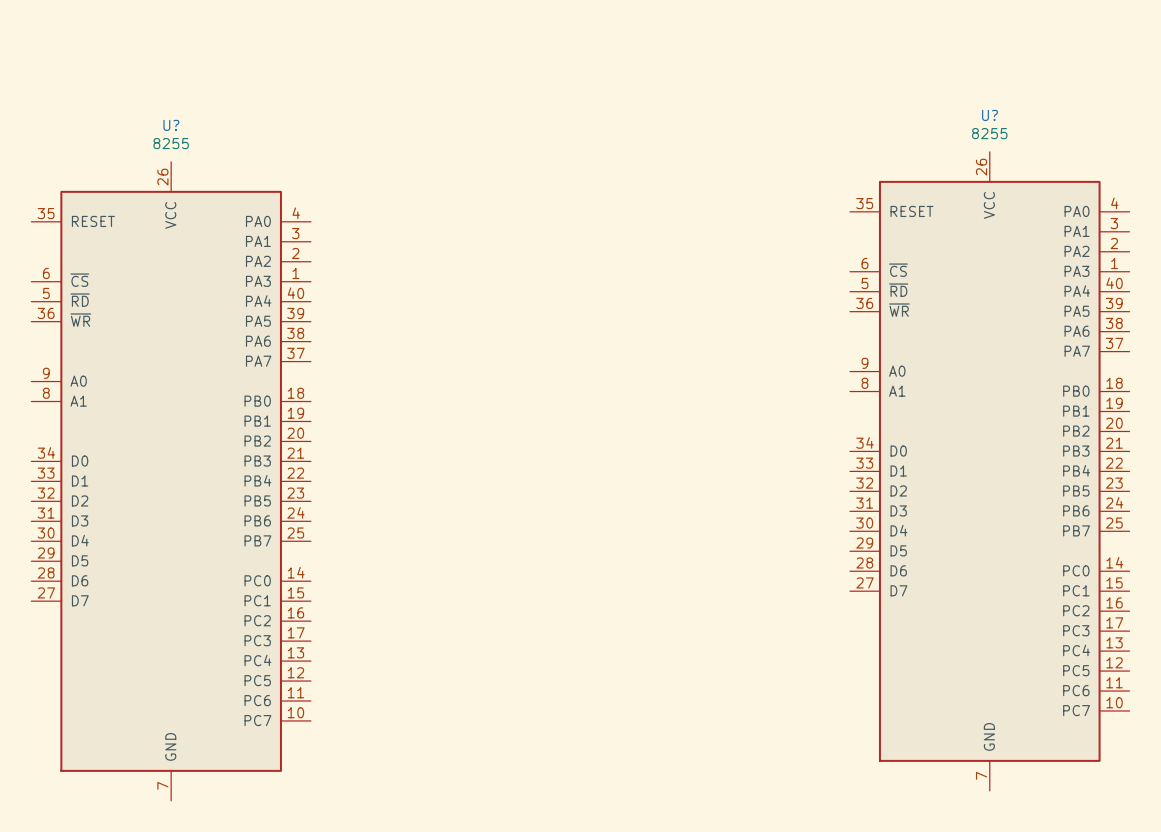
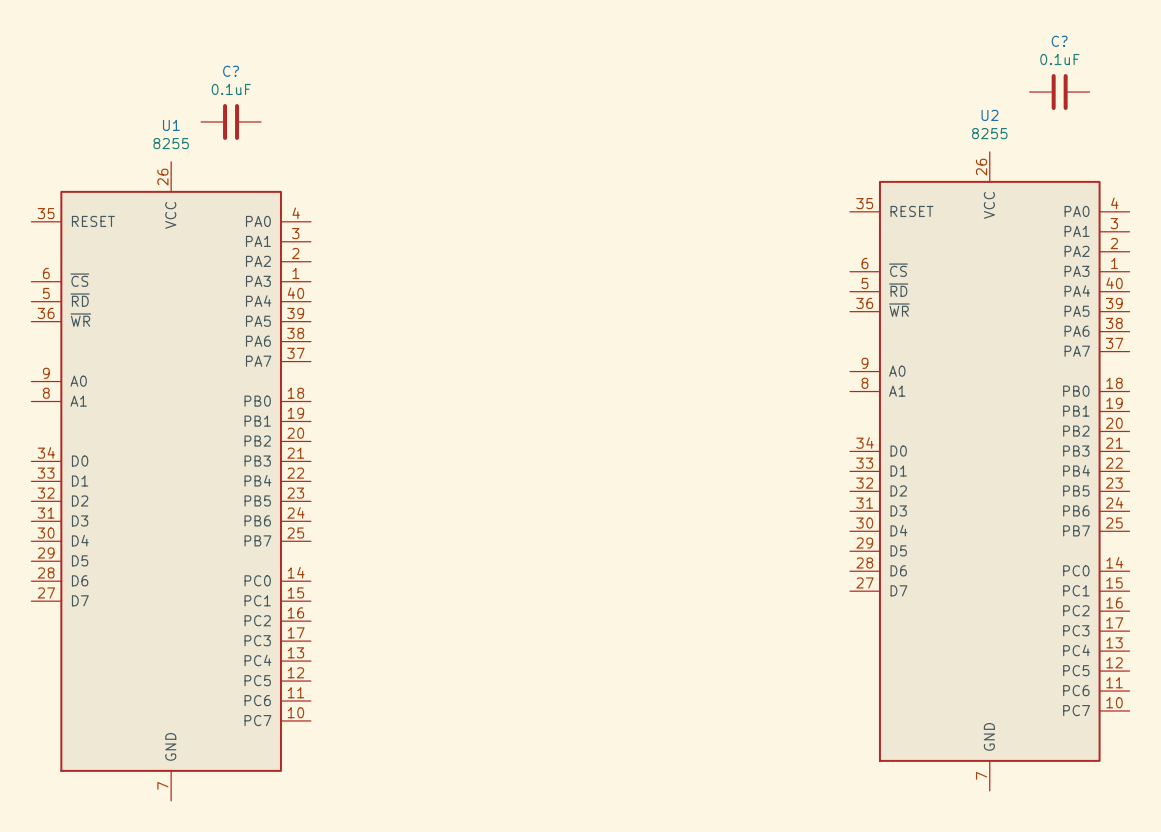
C?: none -> 0.1uF (1059, 92)
U? name: U? (990, 115) -> U2 (990, 115)
C?: none -> 0.1uF (231, 121)
U? name: U? (171, 125) -> U1 (171, 125)

